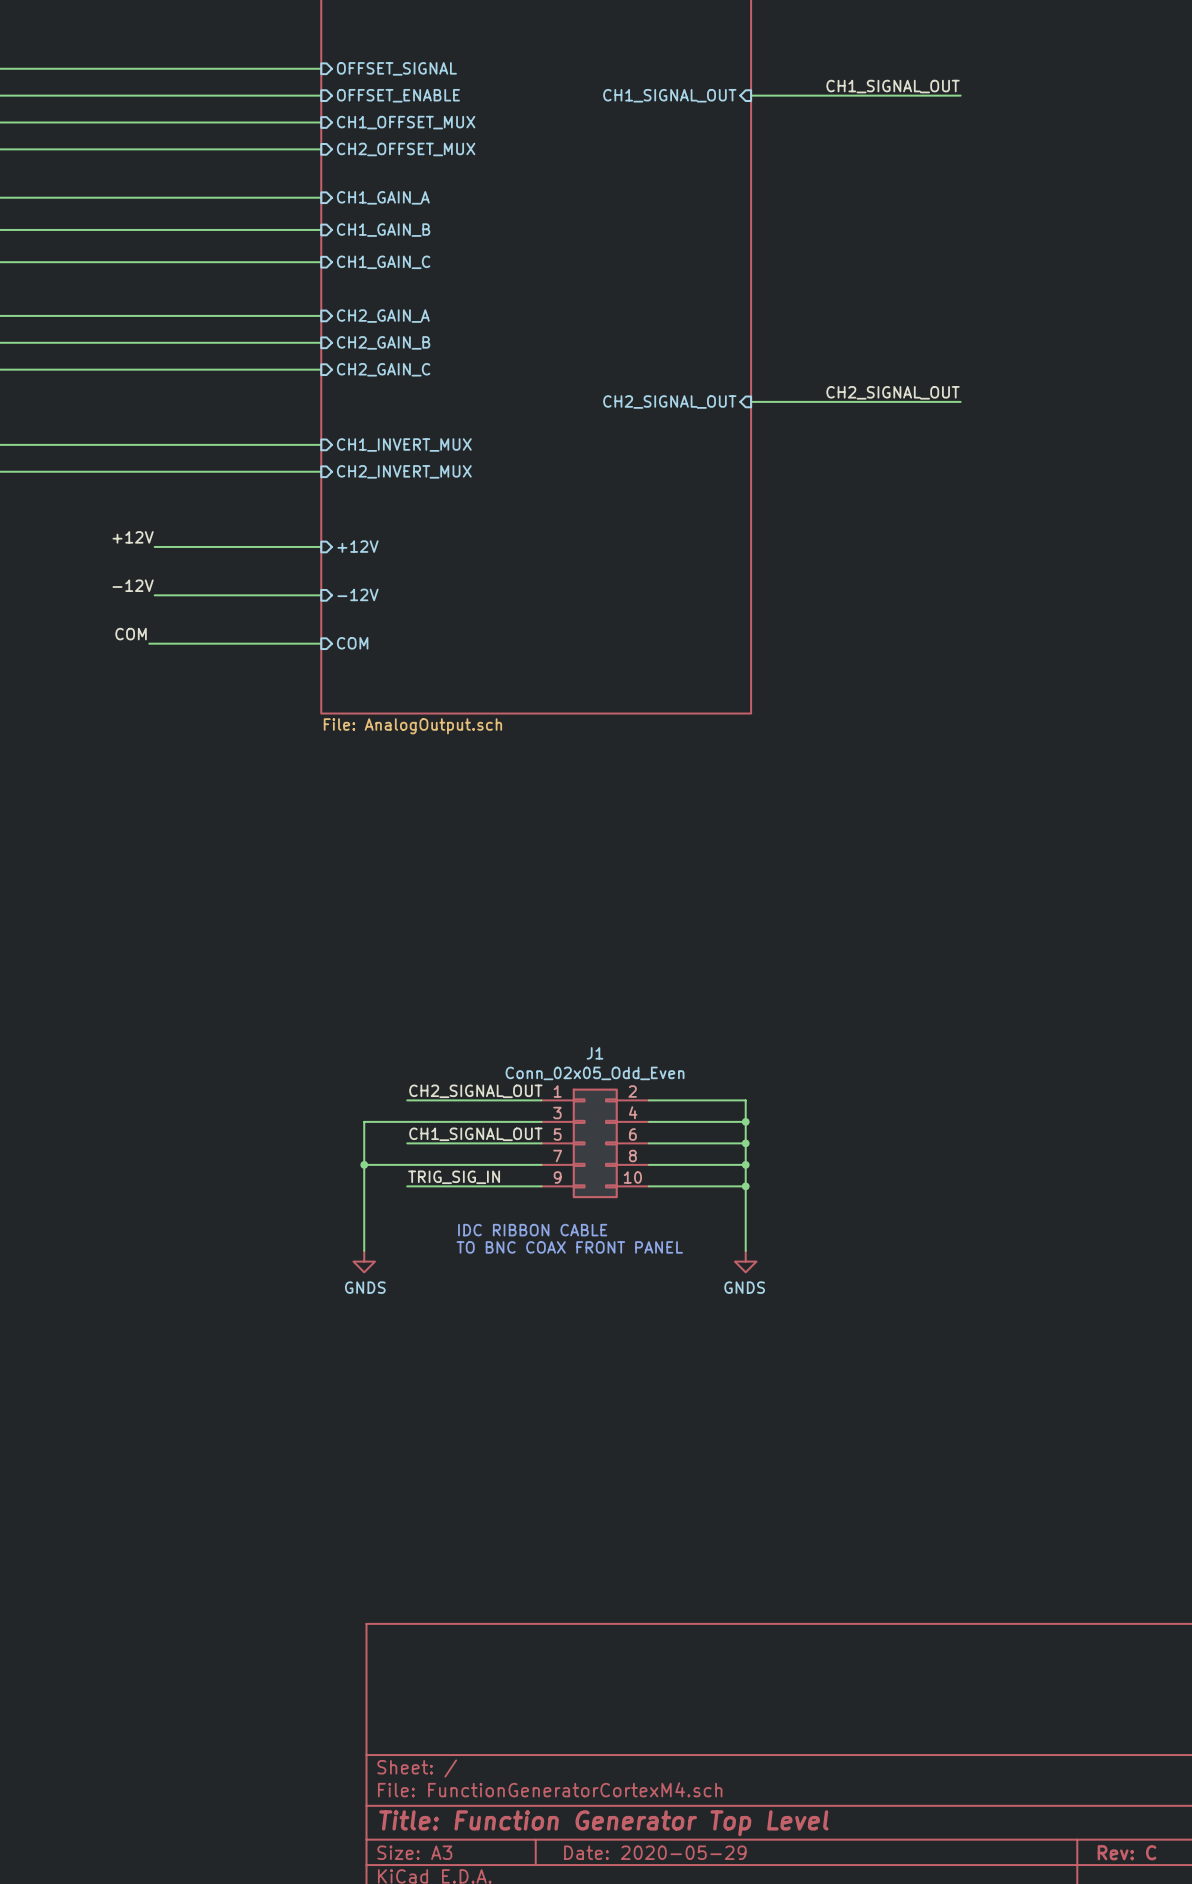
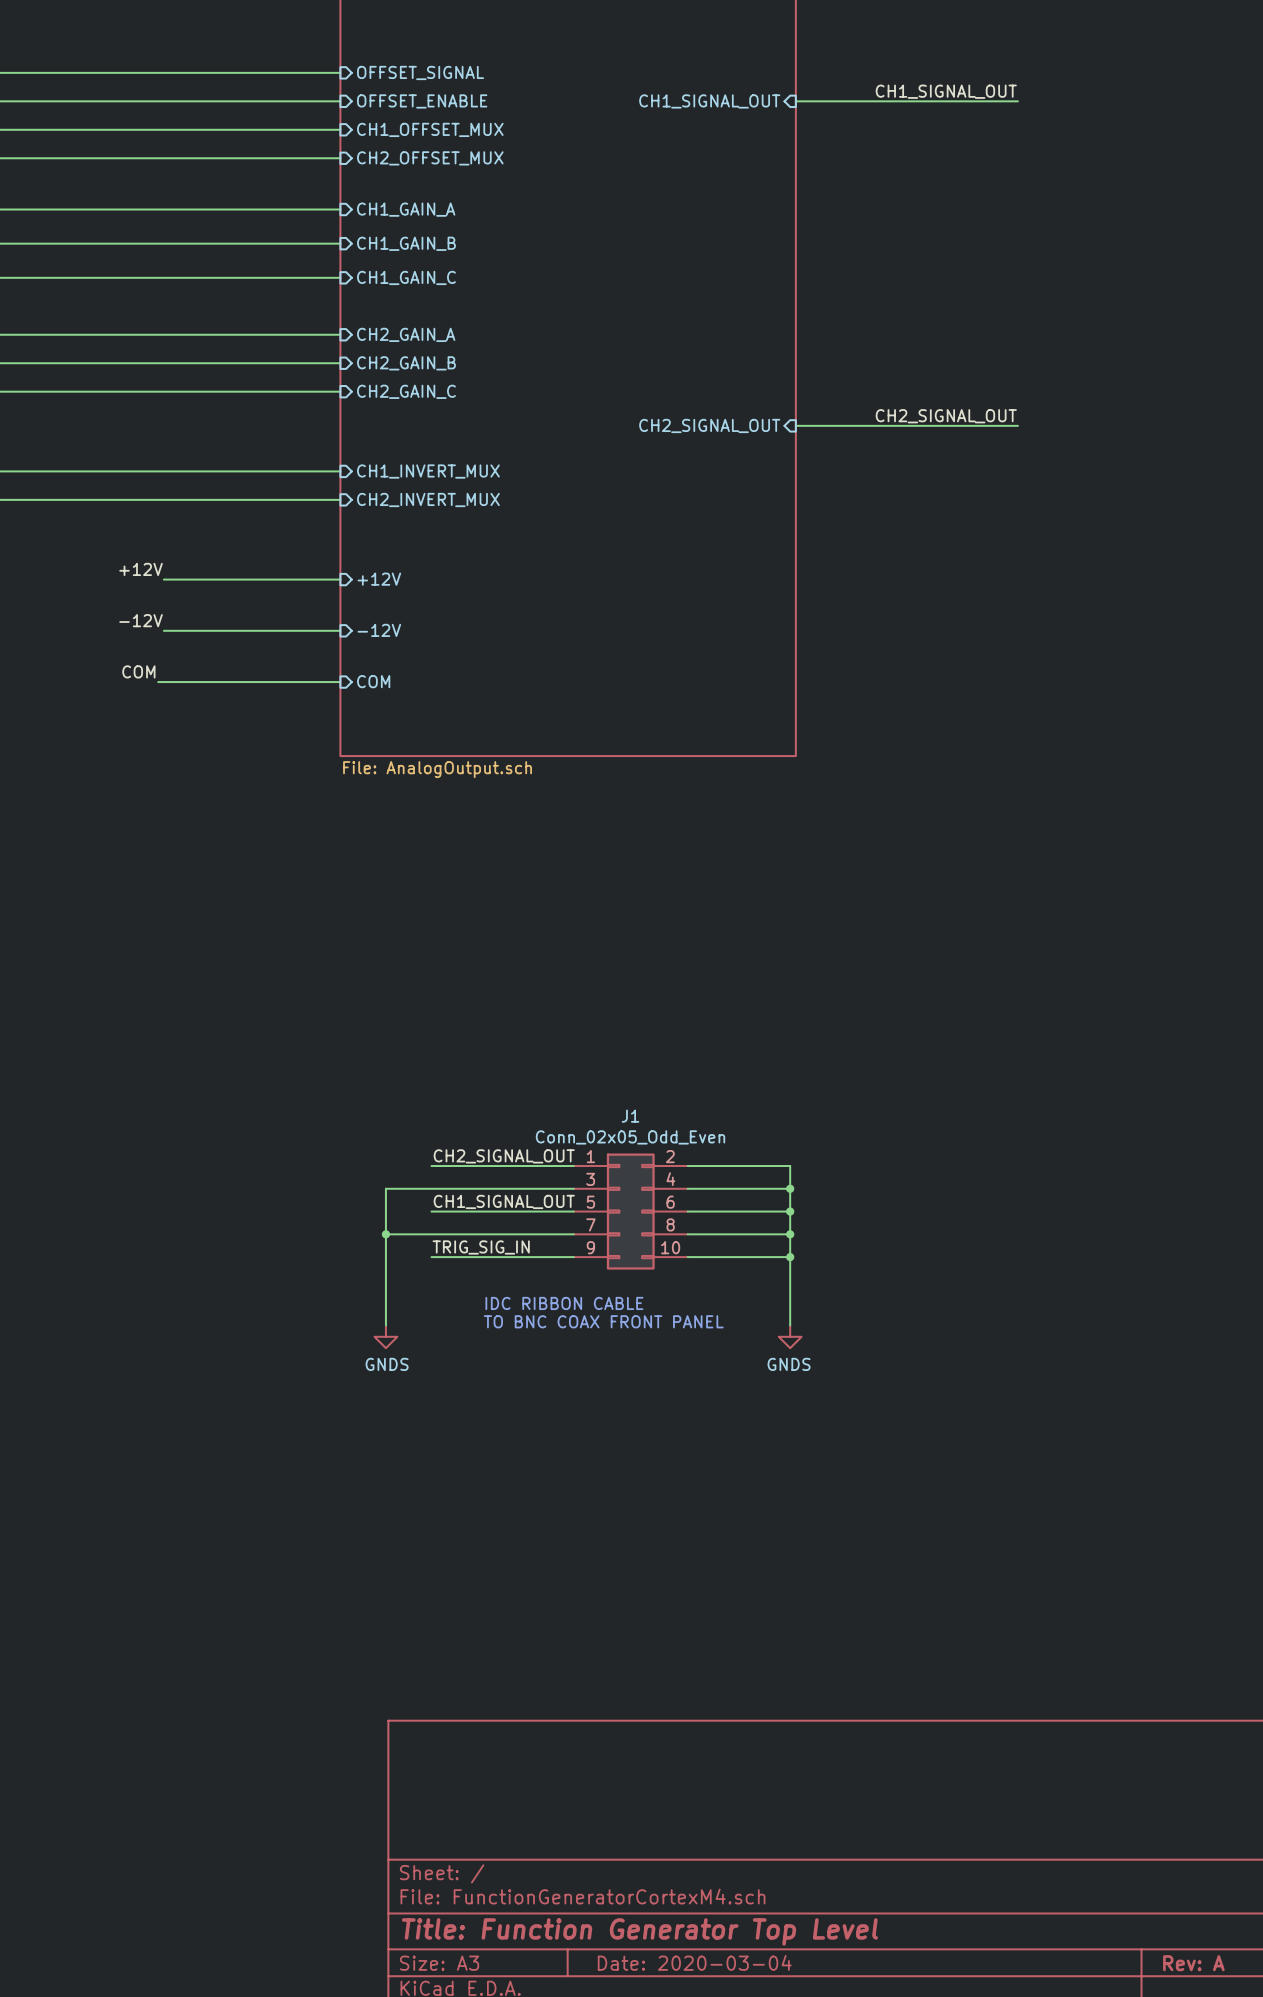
title block: Date: 2020-05-29 (655, 1852) -> Date: 2020-03-04 (694, 1962)
title block: Rev: C (1127, 1852) -> Rev: A (1193, 1963)

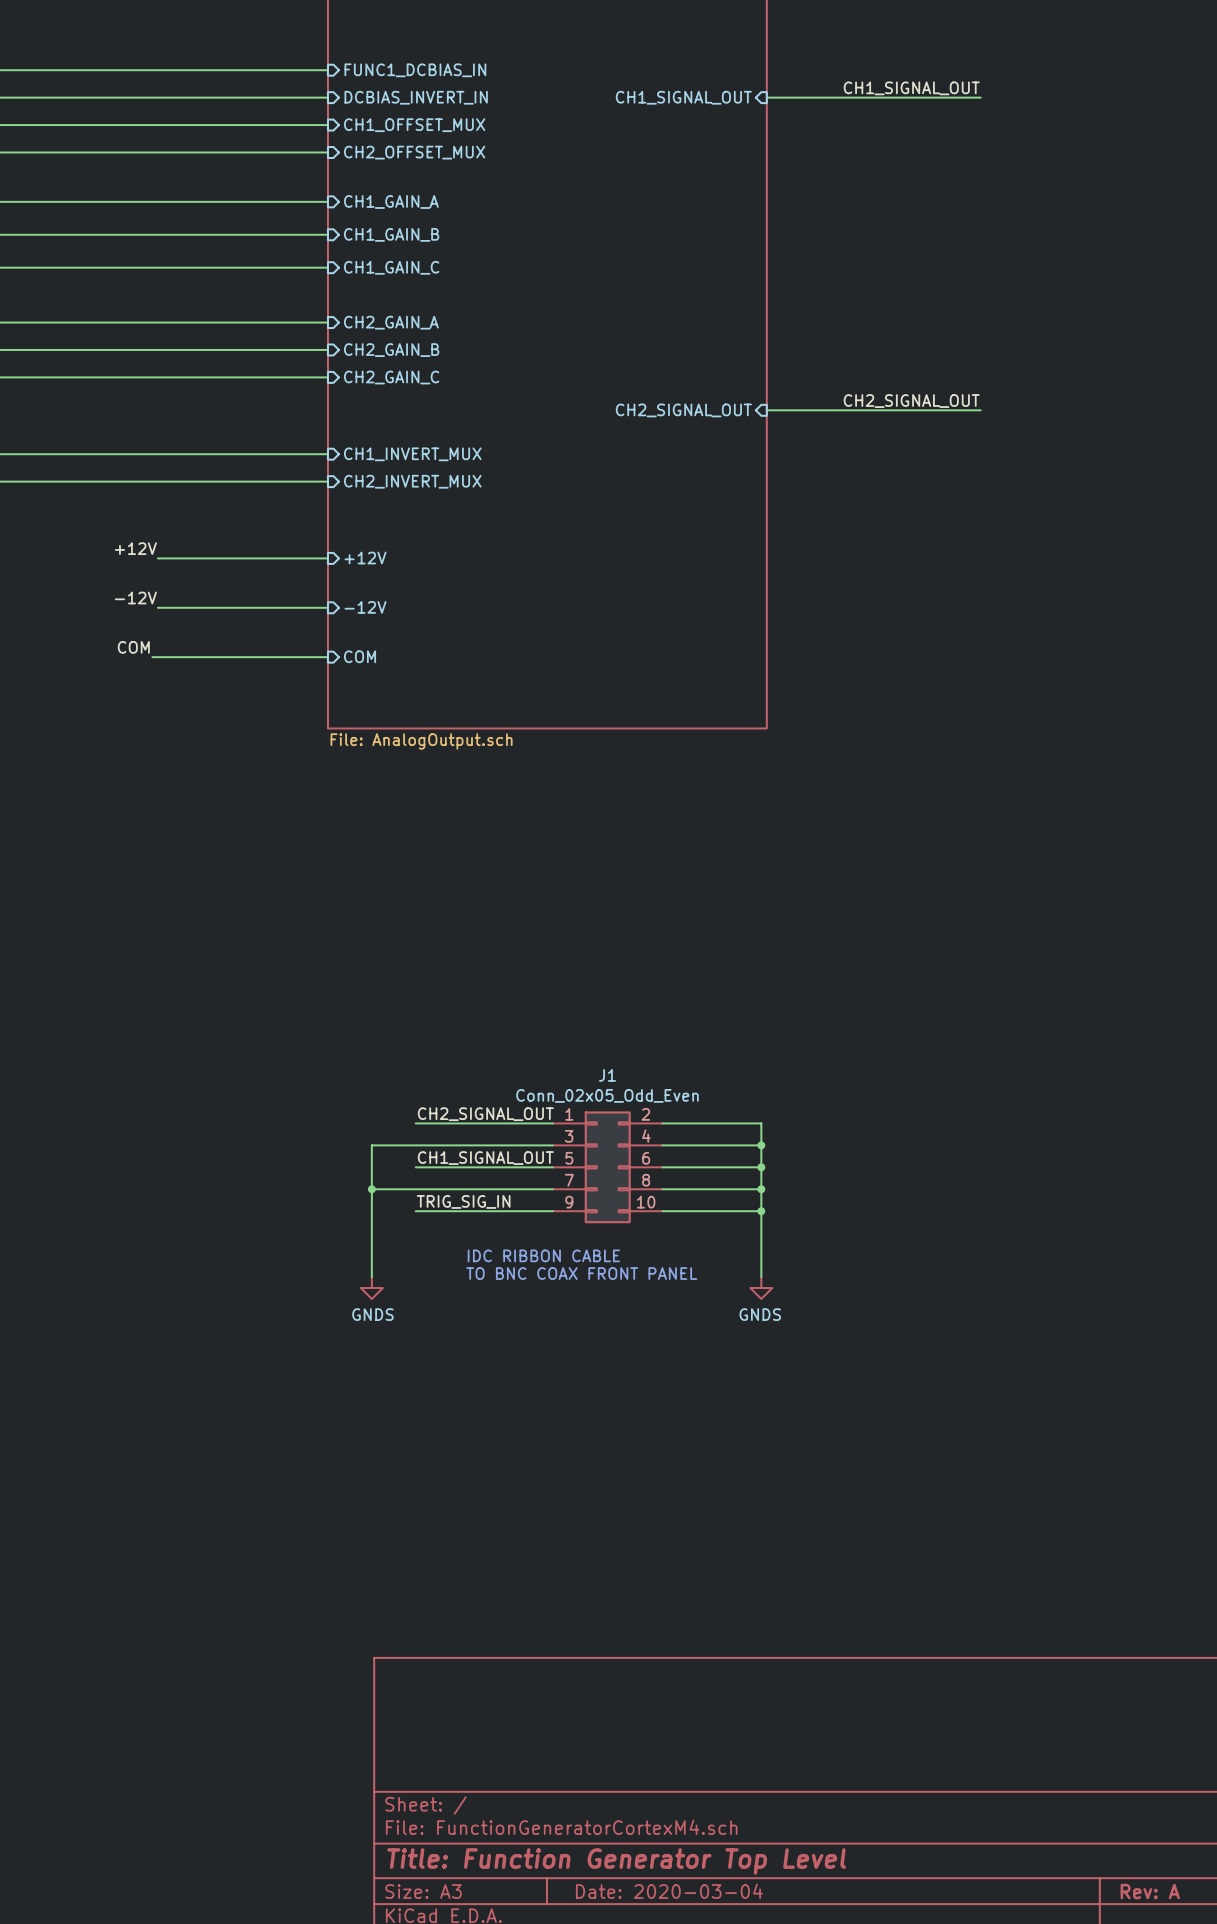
sheet pin: OFFSET_SIGNAL (420, 72) -> FUNC1_DCBIAS_IN (415, 70)
sheet pin: OFFSET_ENABLE (422, 101) -> DCBIAS_INVERT_IN (416, 97)

